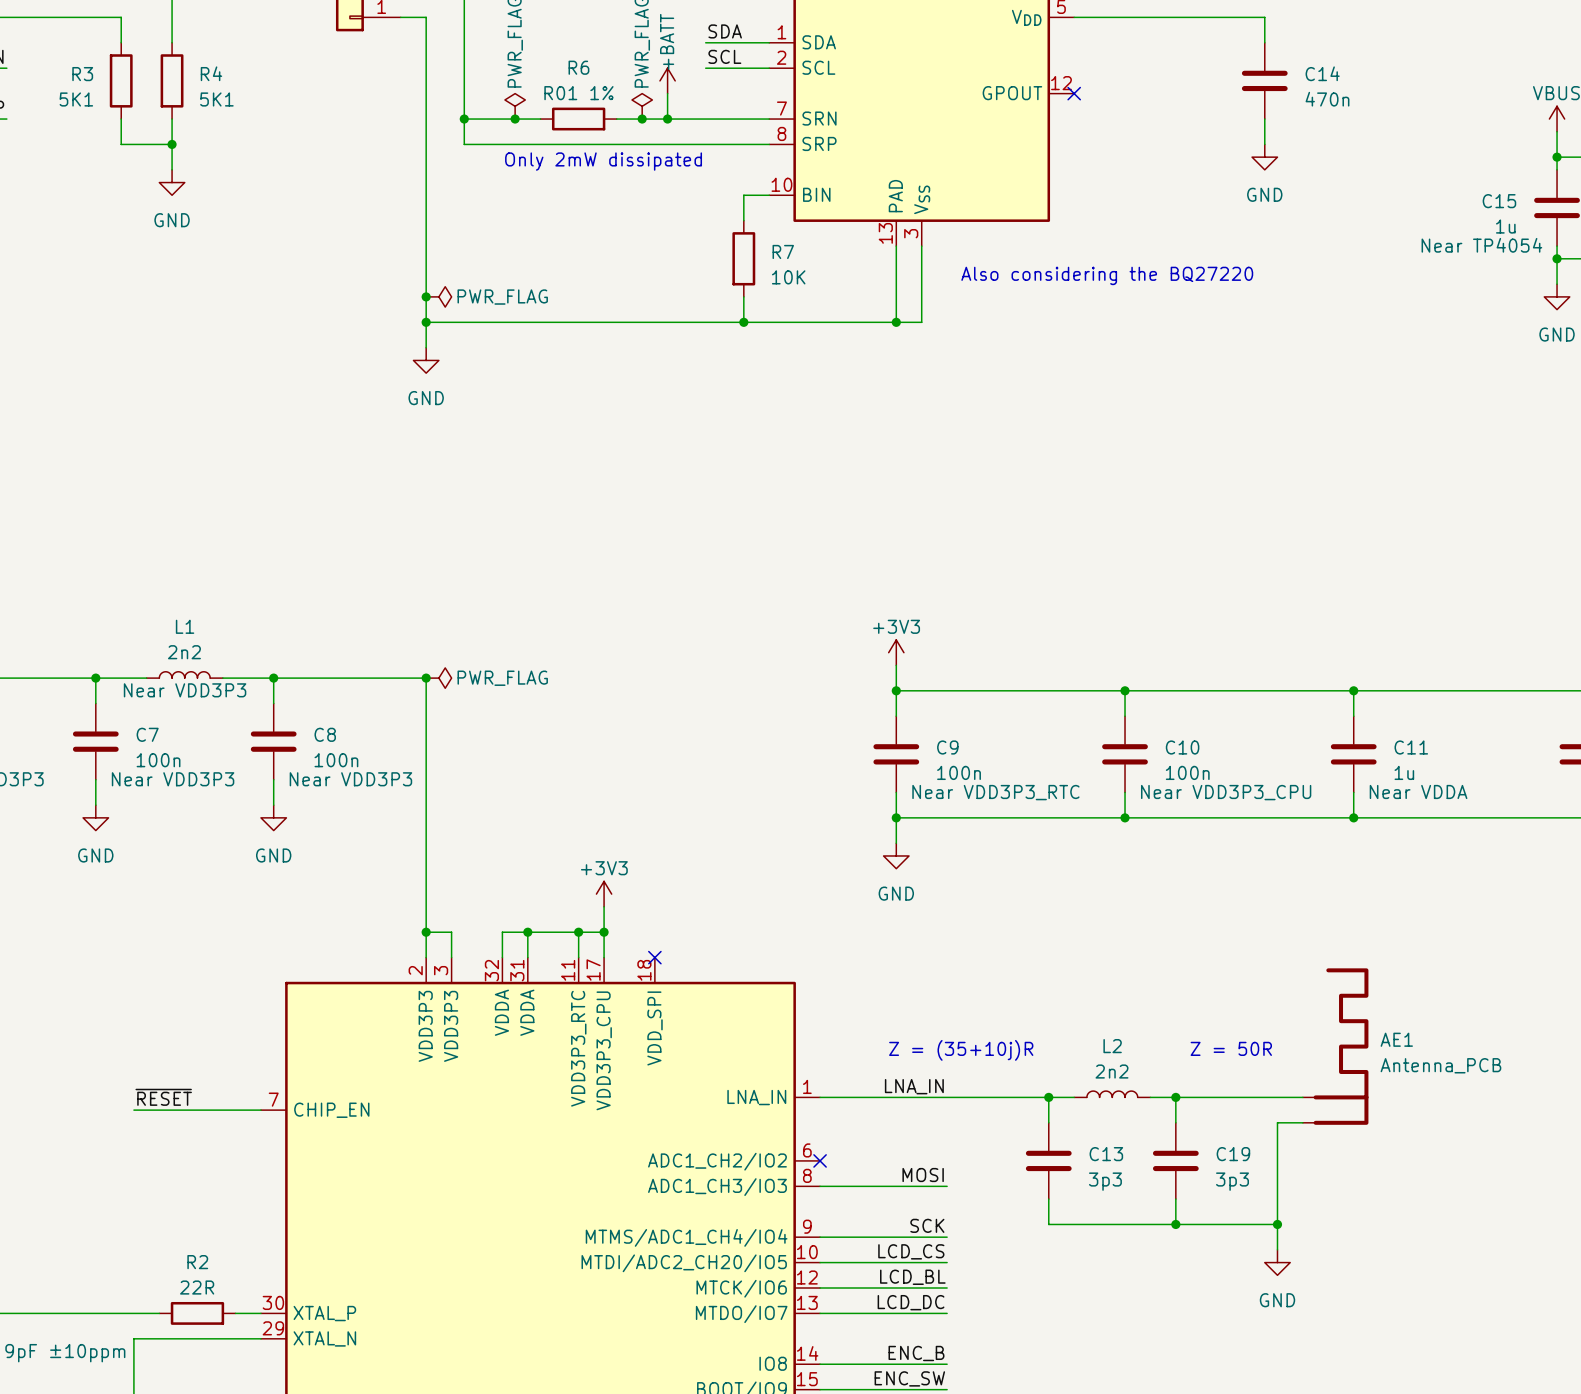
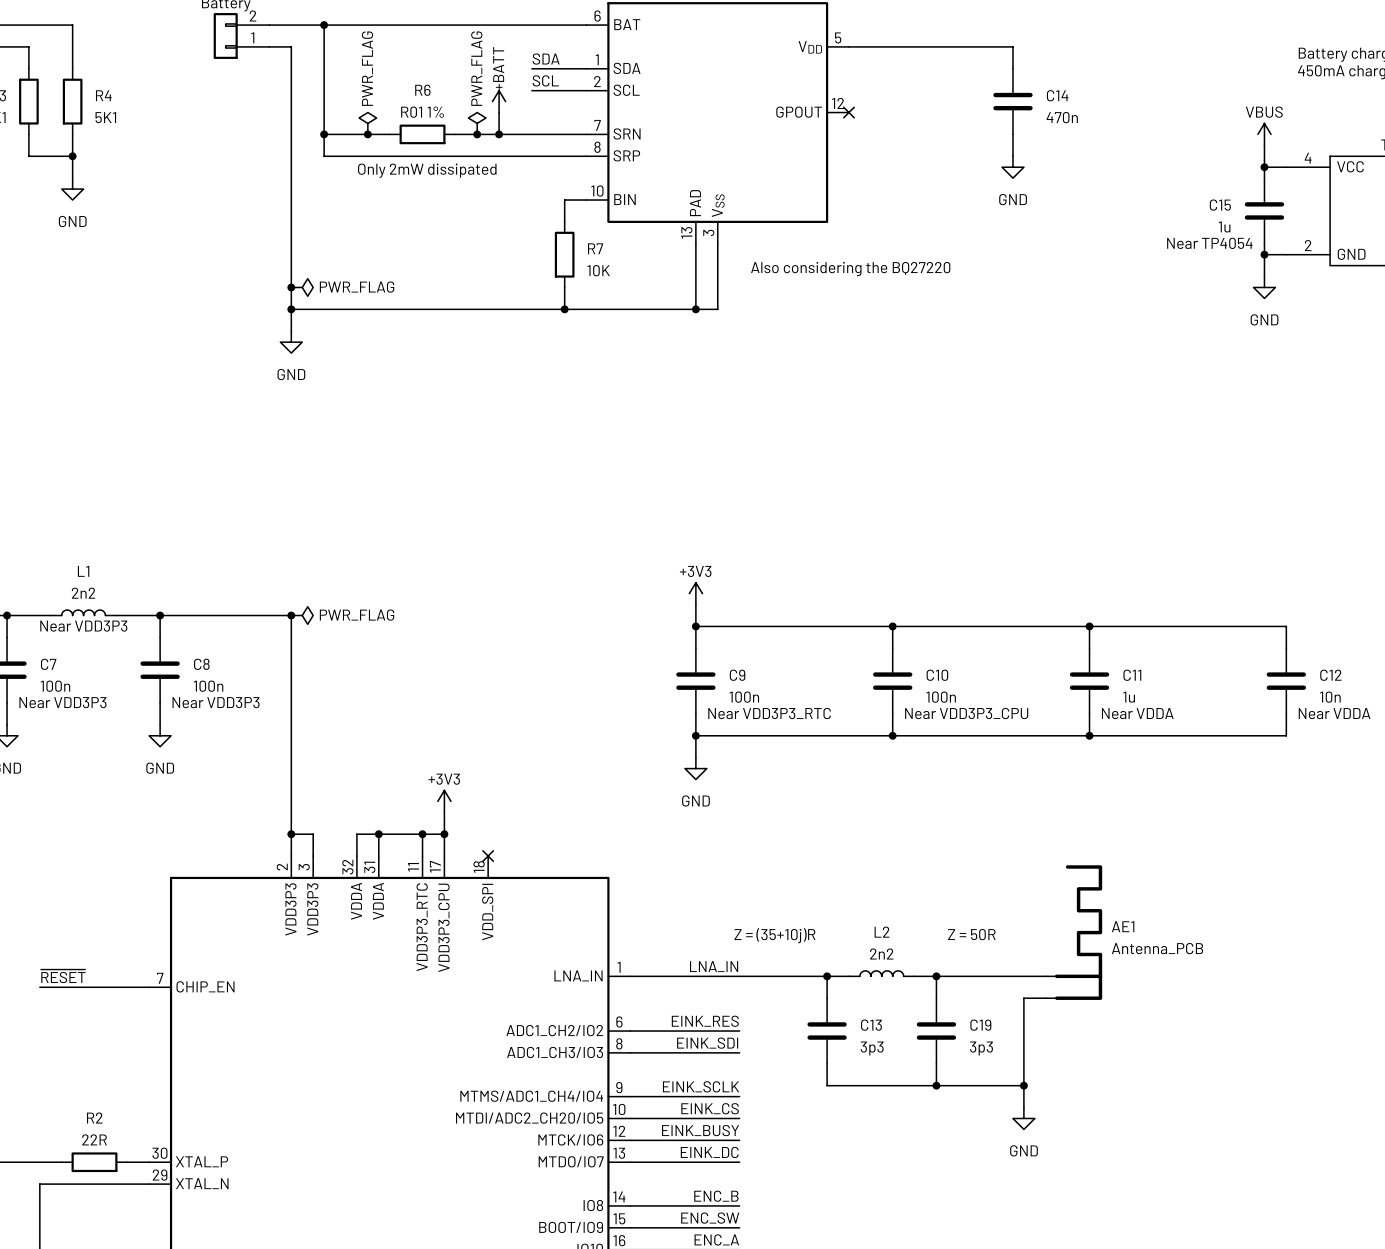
label: none -> EINK_RES (705, 1021)
wire: none -> (630, 1031) (739, 1031)
no-connect mark: (820, 1160) -> none
label: MOSI (923, 1175) -> EINK_SDI (707, 1043)
label: SCK (927, 1225) -> EINK_SCLK (701, 1086)
label: LCD_CS (911, 1251) -> EINK_CS (710, 1108)
label: LCD_BL (912, 1277) -> EINK_BUSY (700, 1130)
label: LCD_DC (911, 1302) -> EINK_DC (709, 1152)

